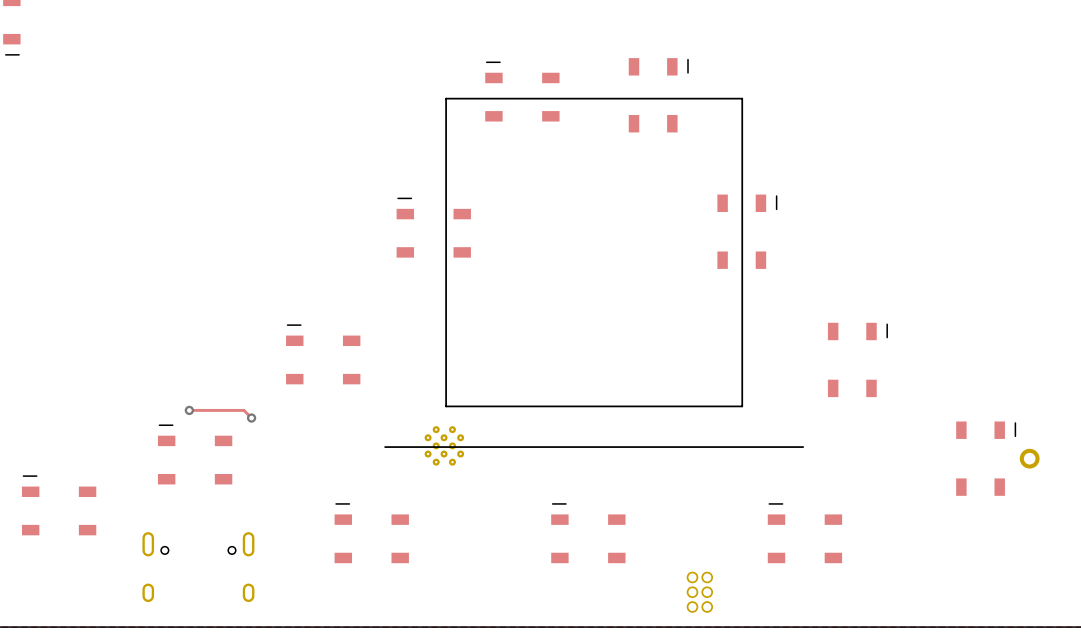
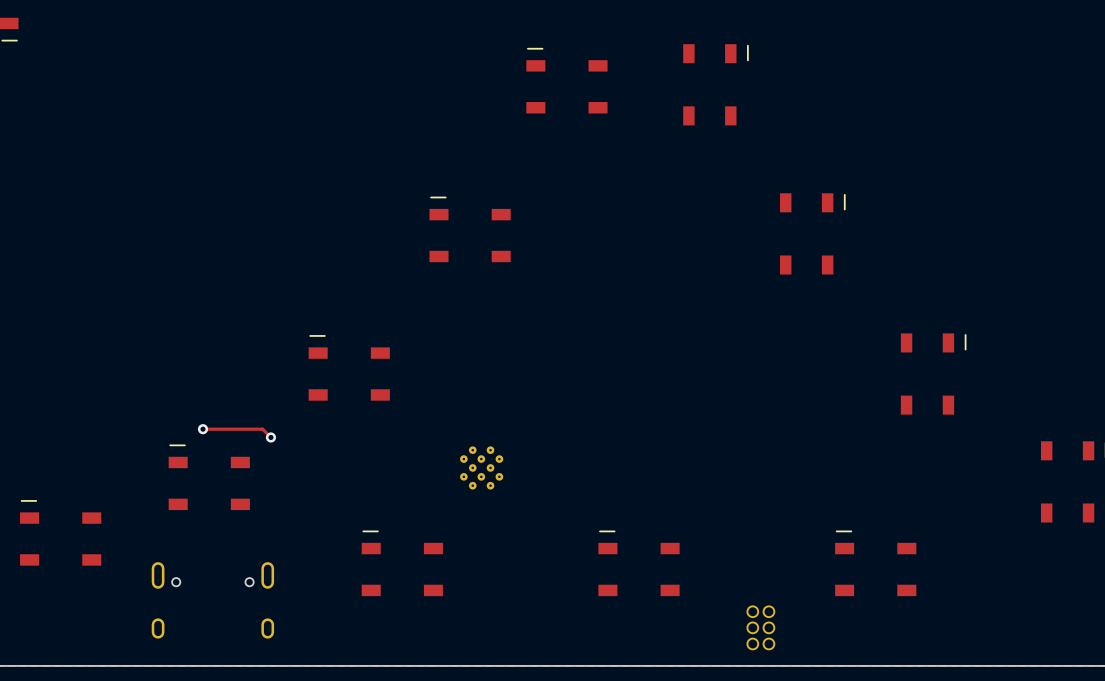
line: (446, 98) (742, 98) (742, 406) (446, 406) (446, 98) -> none
line: (385, 447) (803, 447) -> none

